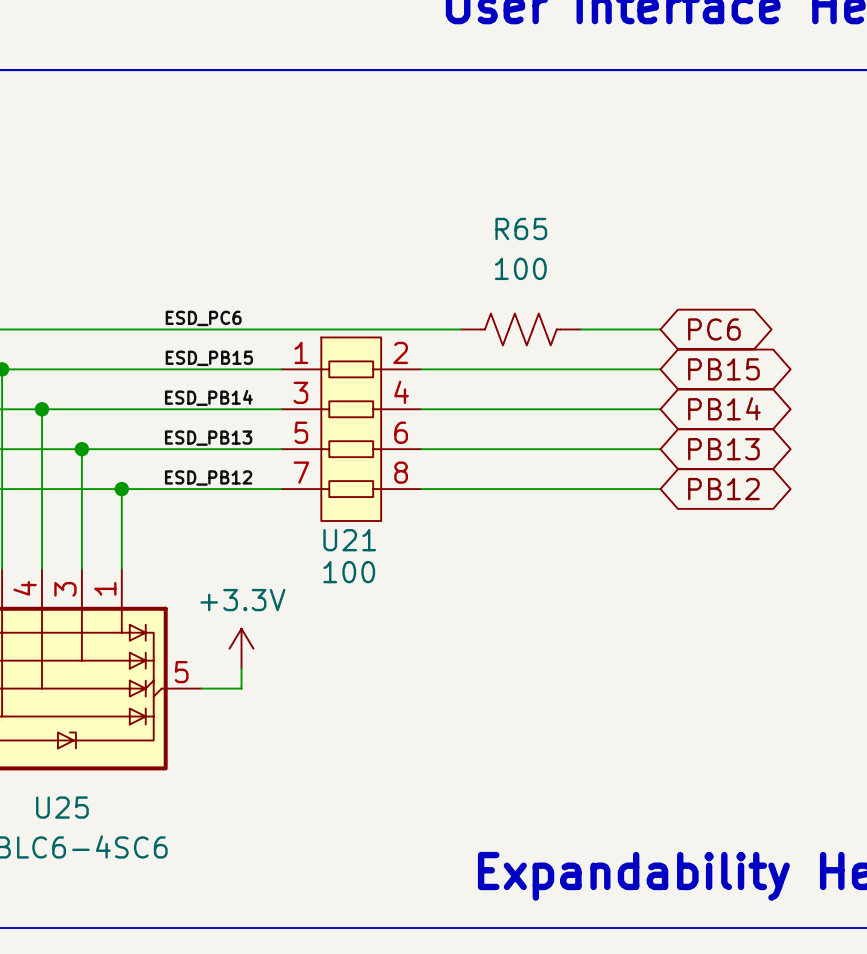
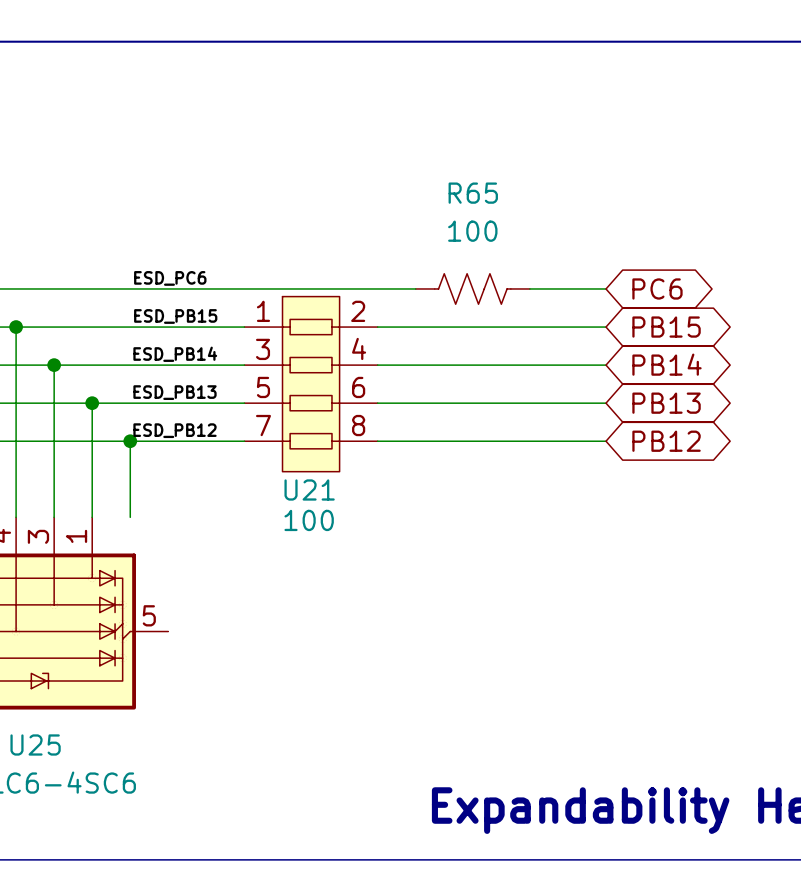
wire: none -> (16, 327) (16, 365)
junction: none -> (16, 327)
junction: (42, 409) -> none
wire: none -> (54, 365) (54, 403)
junction: none -> (54, 365)
junction: (81, 449) -> none
wire: none -> (92, 403) (92, 441)
junction: none -> (92, 403)
junction: (121, 489) -> none
wire: none -> (130, 441) (130, 517)
junction: none -> (130, 441)
power symbol: +3.3V (241, 648) -> none
wire: (241, 668) (241, 688) (201, 688) -> none

